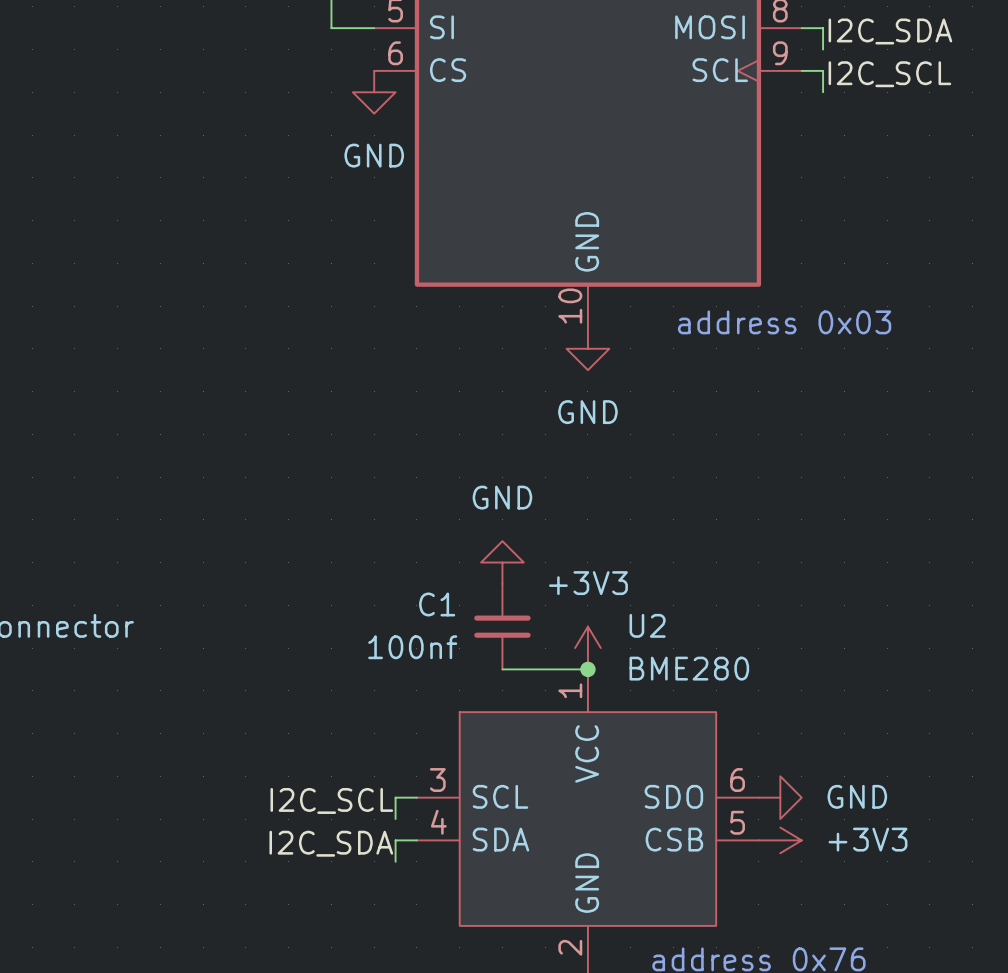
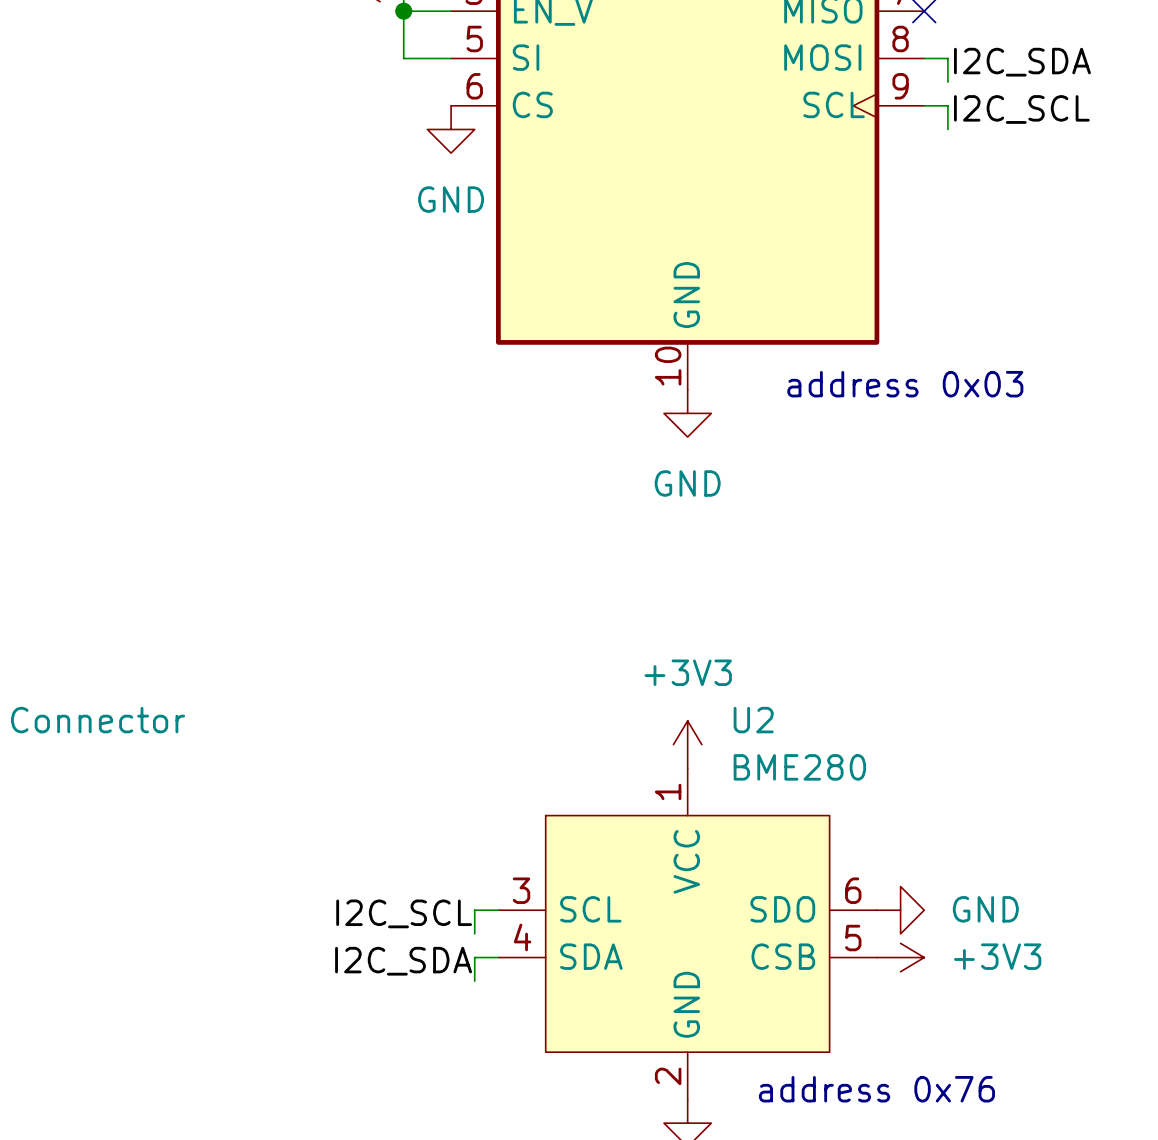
power symbol: GND (502, 562) -> none
C1: 100nf (502, 626) -> none
wire: (502, 669) (587, 669) -> none
junction: (587, 669) -> none

